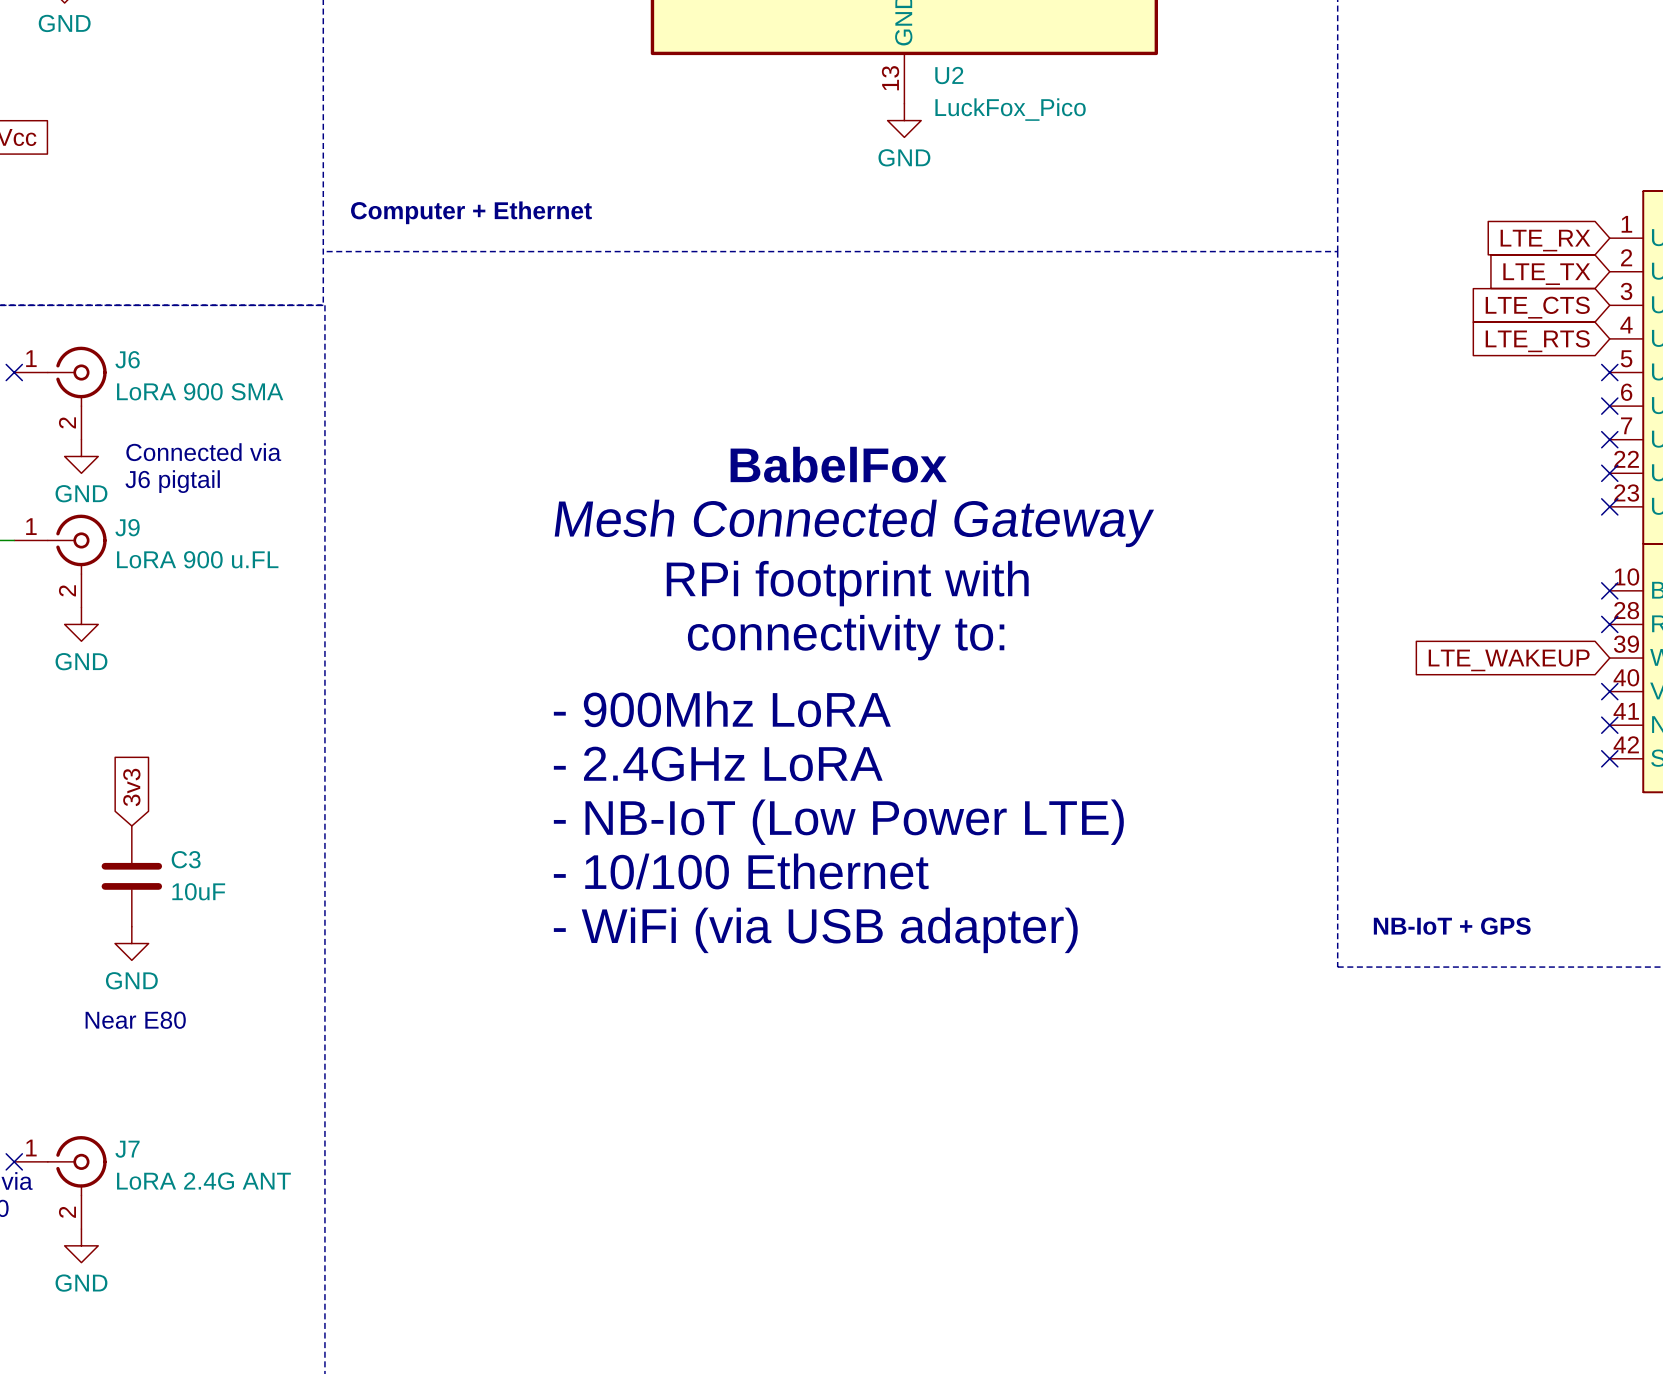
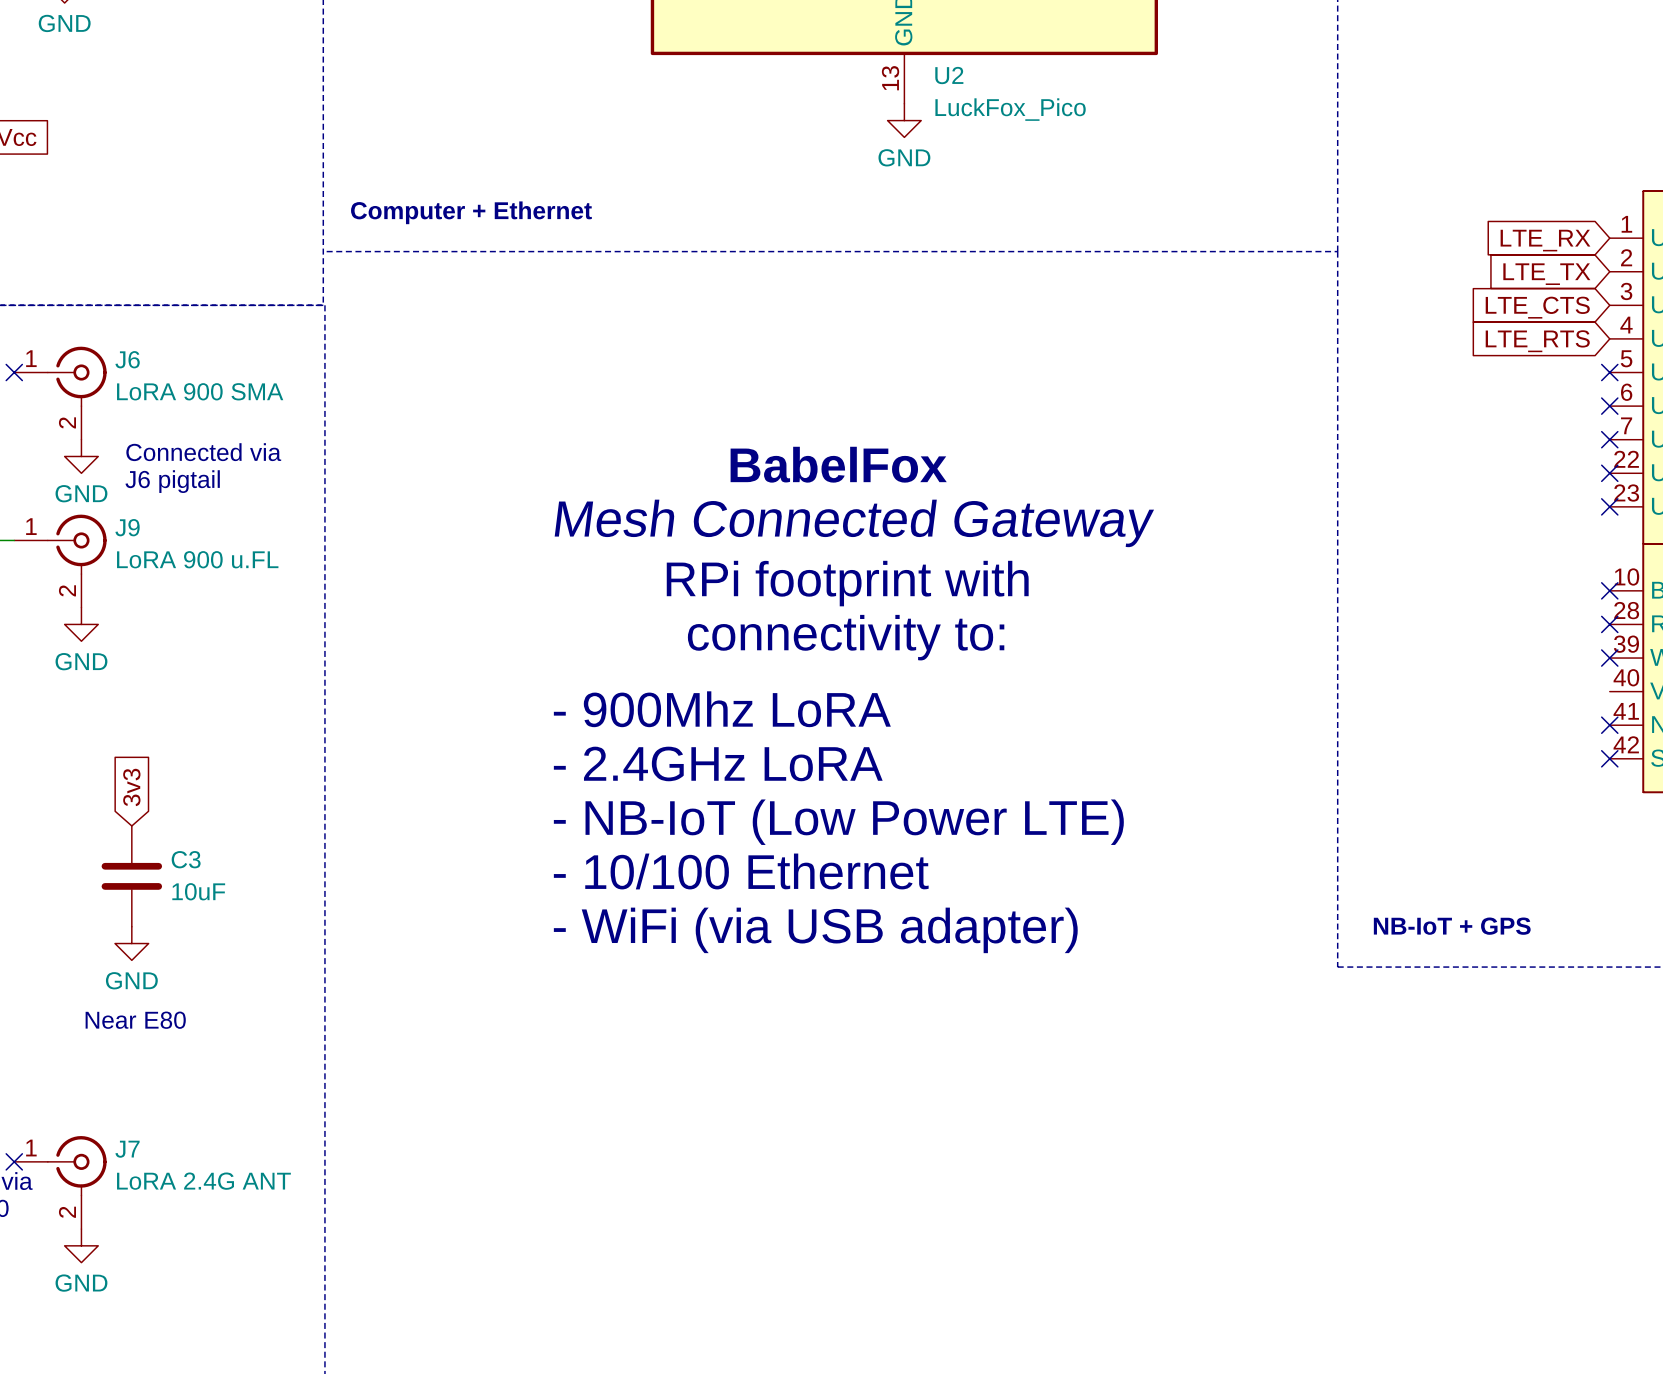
global label: LTE_WAKEUP (1509, 660) -> none
no-connect mark position: (1609, 691) -> (1609, 658)

